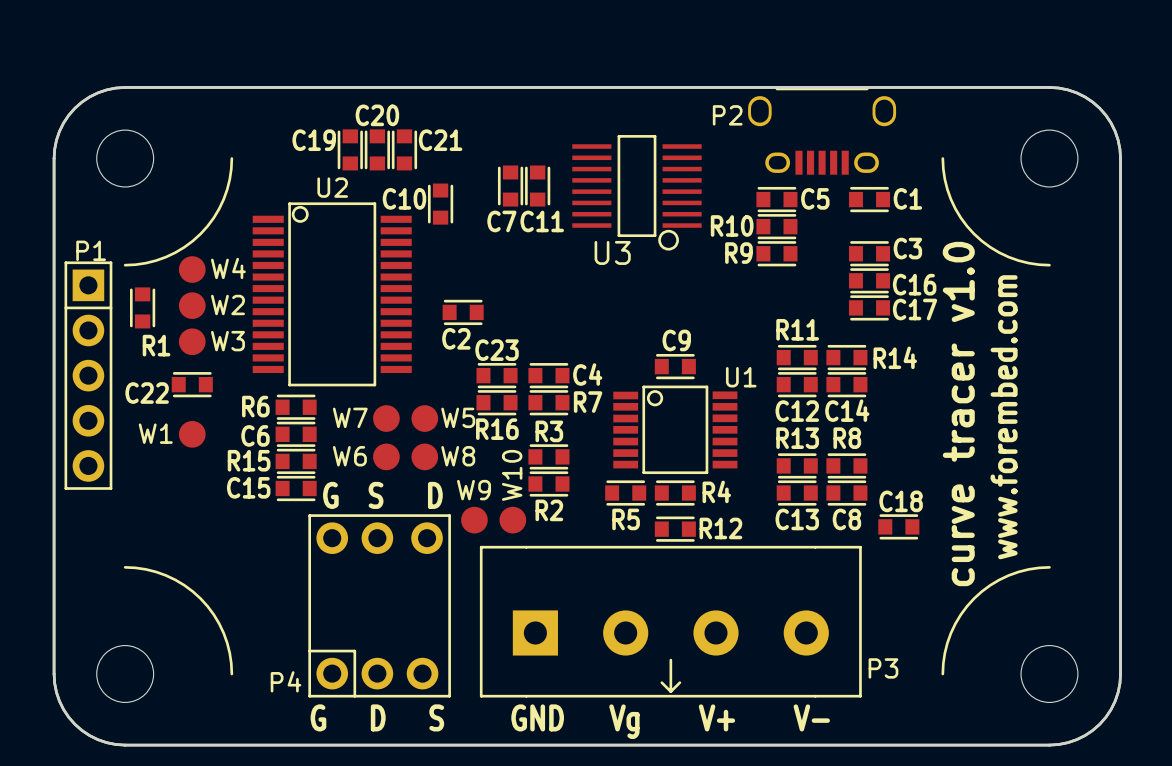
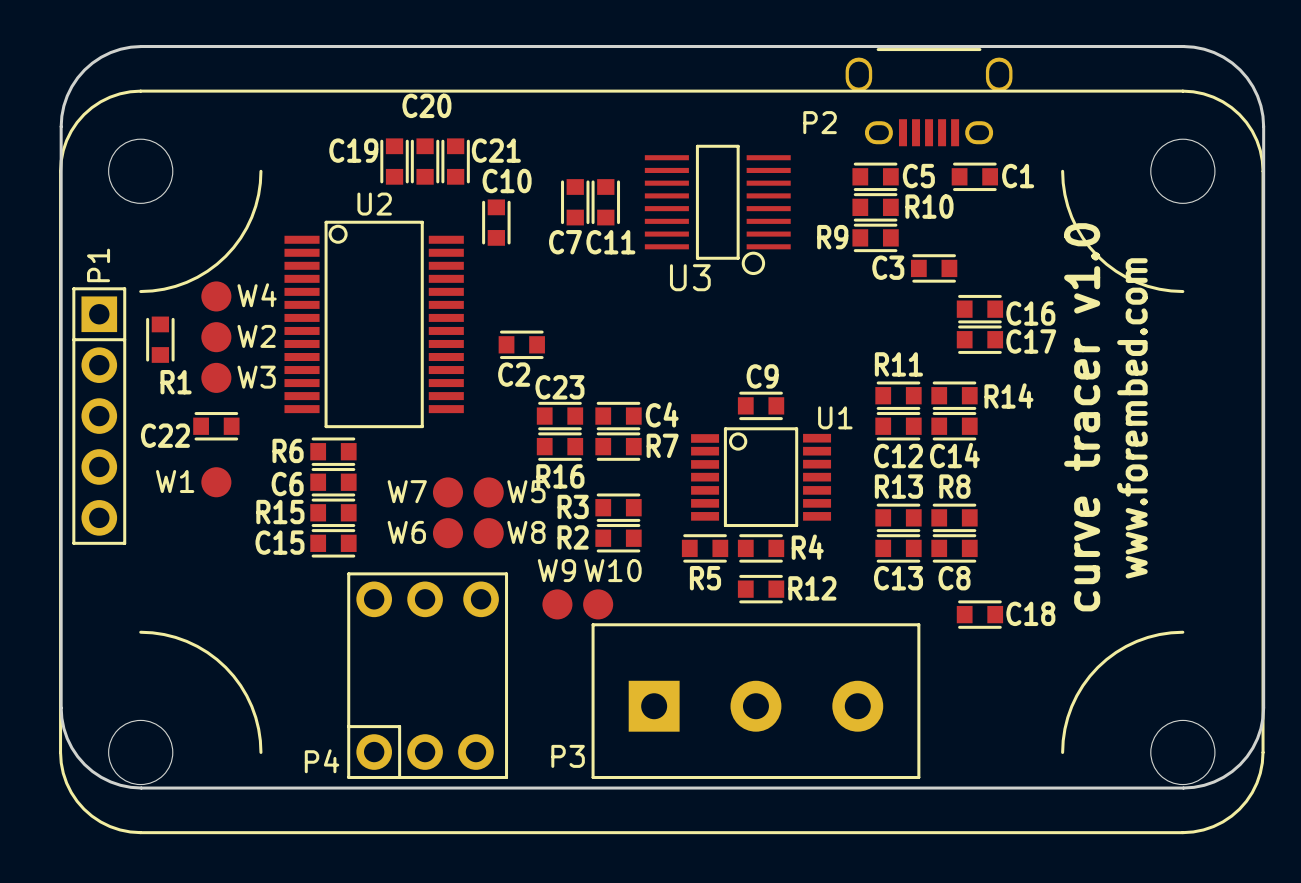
board edge: (125, 87) (1049, 87) (1067, 89) (1085, 96) (1099, 108) (1111, 122) (1118, 140) (1120, 158) (1120, 674) (1118, 692) (1111, 709) (1099, 724) (1085, 735) (1067, 742) (1049, 745) (125, 745) (106, 742) (89, 735) (74, 724) (63, 709) (56, 692) (54, 674) (54, 158) (59, 131) (74, 108) (97, 92) (125, 87) -> (141, 46) (1183, 46) (1204, 49) (1223, 57) (1240, 69) (1252, 86) (1260, 105) (1263, 126) (1263, 707) (1260, 728) (1252, 747) (1240, 764) (1223, 777) (1204, 785) (1183, 788) (141, 788) (120, 785) (101, 777) (84, 764) (71, 747) (63, 728) (61, 707) (61, 126) (67, 95) (84, 69) (110, 52) (141, 46)
C20 name position: C20 (377, 115) -> C20 (426, 105)
P2 position: (822, 131) -> (929, 97)
C10 name position: C10 (404, 198) -> C10 (507, 181)
C5 position: (776, 199) -> (875, 176)
C1 position: (869, 199) -> (974, 176)
R10 name position: R10 (732, 225) -> R10 (929, 206)
R10 position: (776, 226) -> (875, 207)
C3 name position: C3 (907, 248) -> C3 (888, 267)
P1 name rotation: 0° (91, 250) -> 90° counterclockwise (98, 265)
R9 position: (776, 253) -> (875, 237)
C3 position: (869, 253) -> (934, 268)
text position: curve tracer v1.0 (958, 414) -> curve tracer v1.0 (1082, 417)
text position: www.forembed.com (1004, 417) -> www.forembed.com (1132, 418)
W7 position: (386, 418) -> (447, 492)
W5 position: (424, 418) -> (488, 492)
R3 name position: R3 (549, 431) -> R3 (573, 506)
W6 position: (386, 456) -> (447, 533)
W8 position: (424, 456) -> (488, 533)
W10 name rotation: 0° (512, 475) -> 90° clockwise (612, 570)
text: G S D (382, 495) -> none
C18 name position: C18 (901, 501) -> C18 (1030, 613)
R2 name position: R2 (549, 510) -> R2 (573, 537)
W9 position: (474, 520) -> (557, 604)
W10 position: (512, 520) -> (598, 604)
C18 position: (898, 526) -> (979, 614)
P3 footprint: [479, 545, 862, 698] -> [591, 623, 921, 780]
P3 name position: P3 (883, 668) -> P3 (568, 756)
text: G D S (377, 717) -> none
text: GND (537, 717) -> none
text: V+ (716, 717) -> none
text: V- (811, 717) -> none
text: Vg (624, 721) -> none

